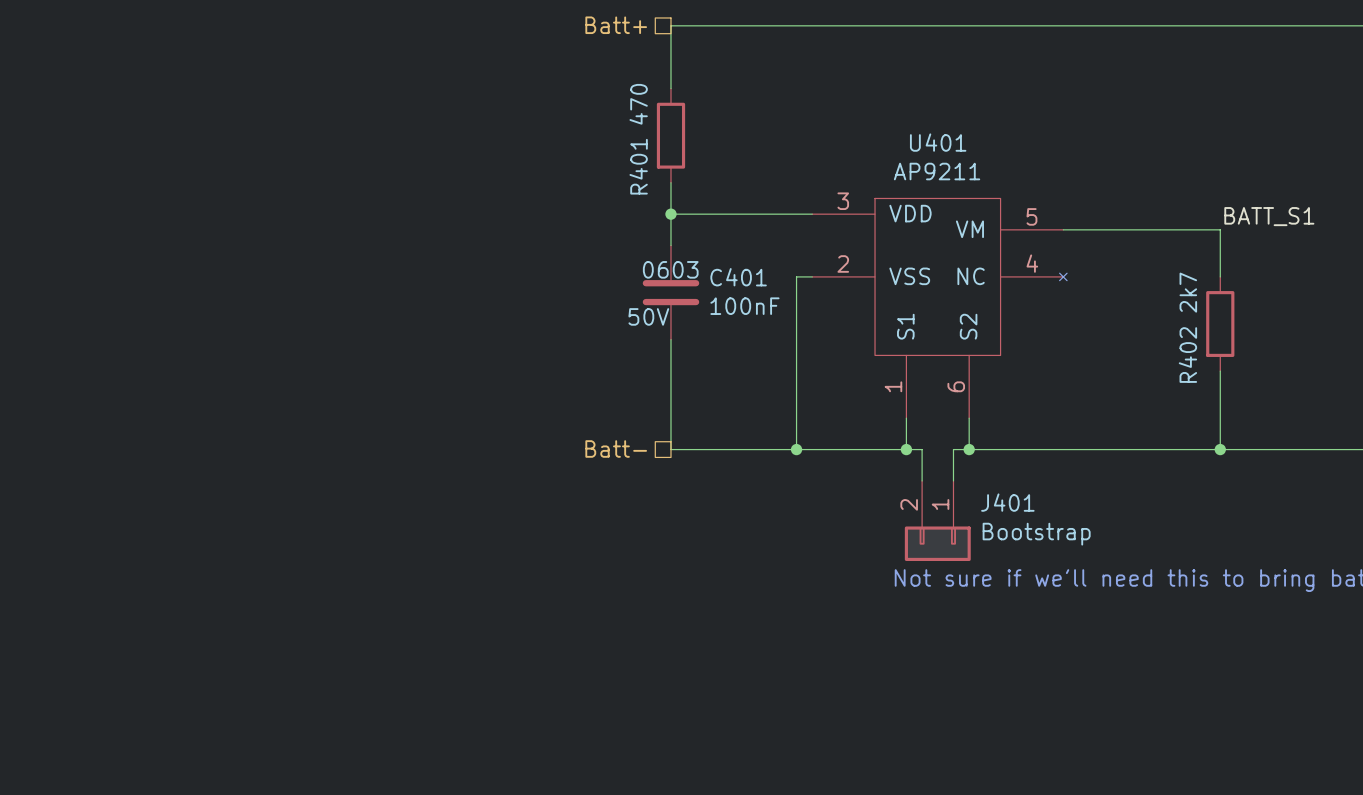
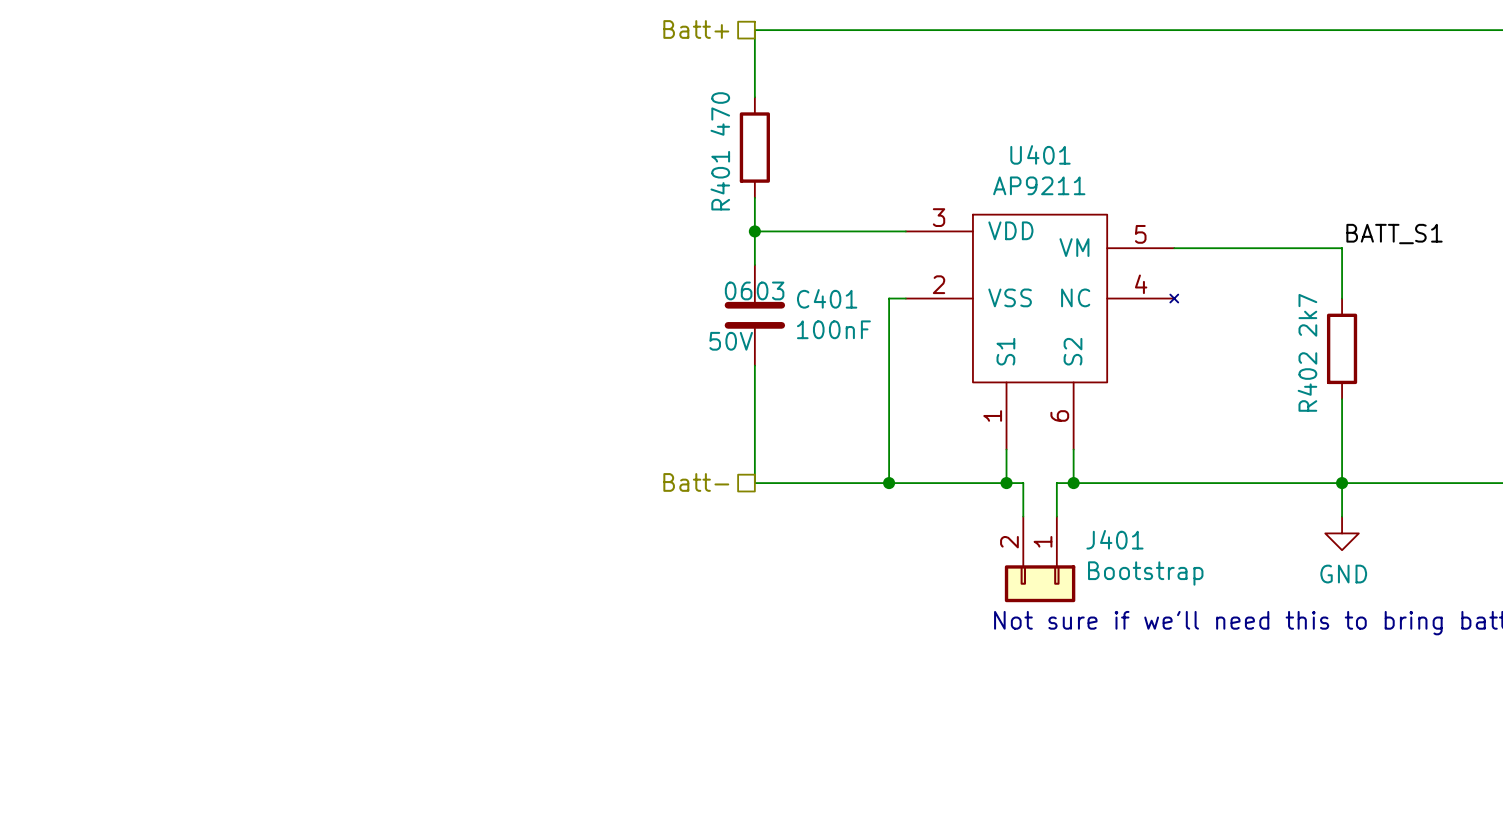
wire: none -> (1342, 483) (1342, 516)
power symbol: none -> GND (1342, 533)

